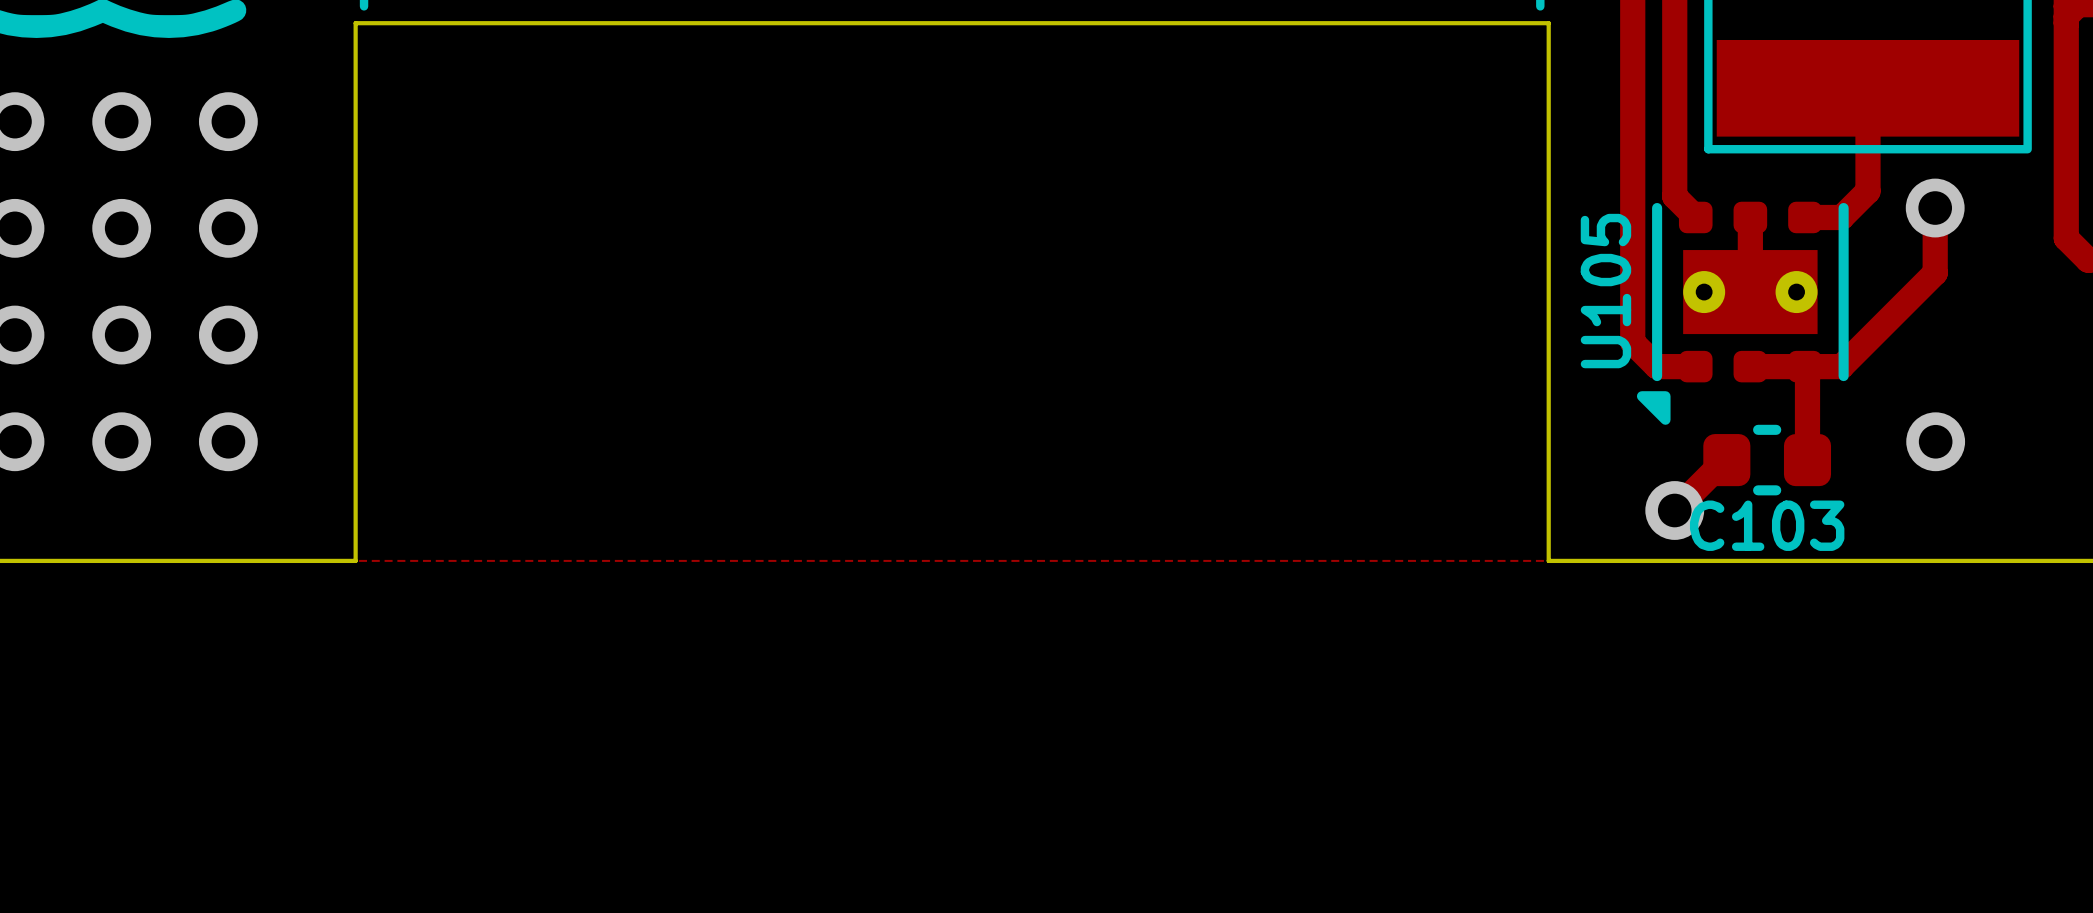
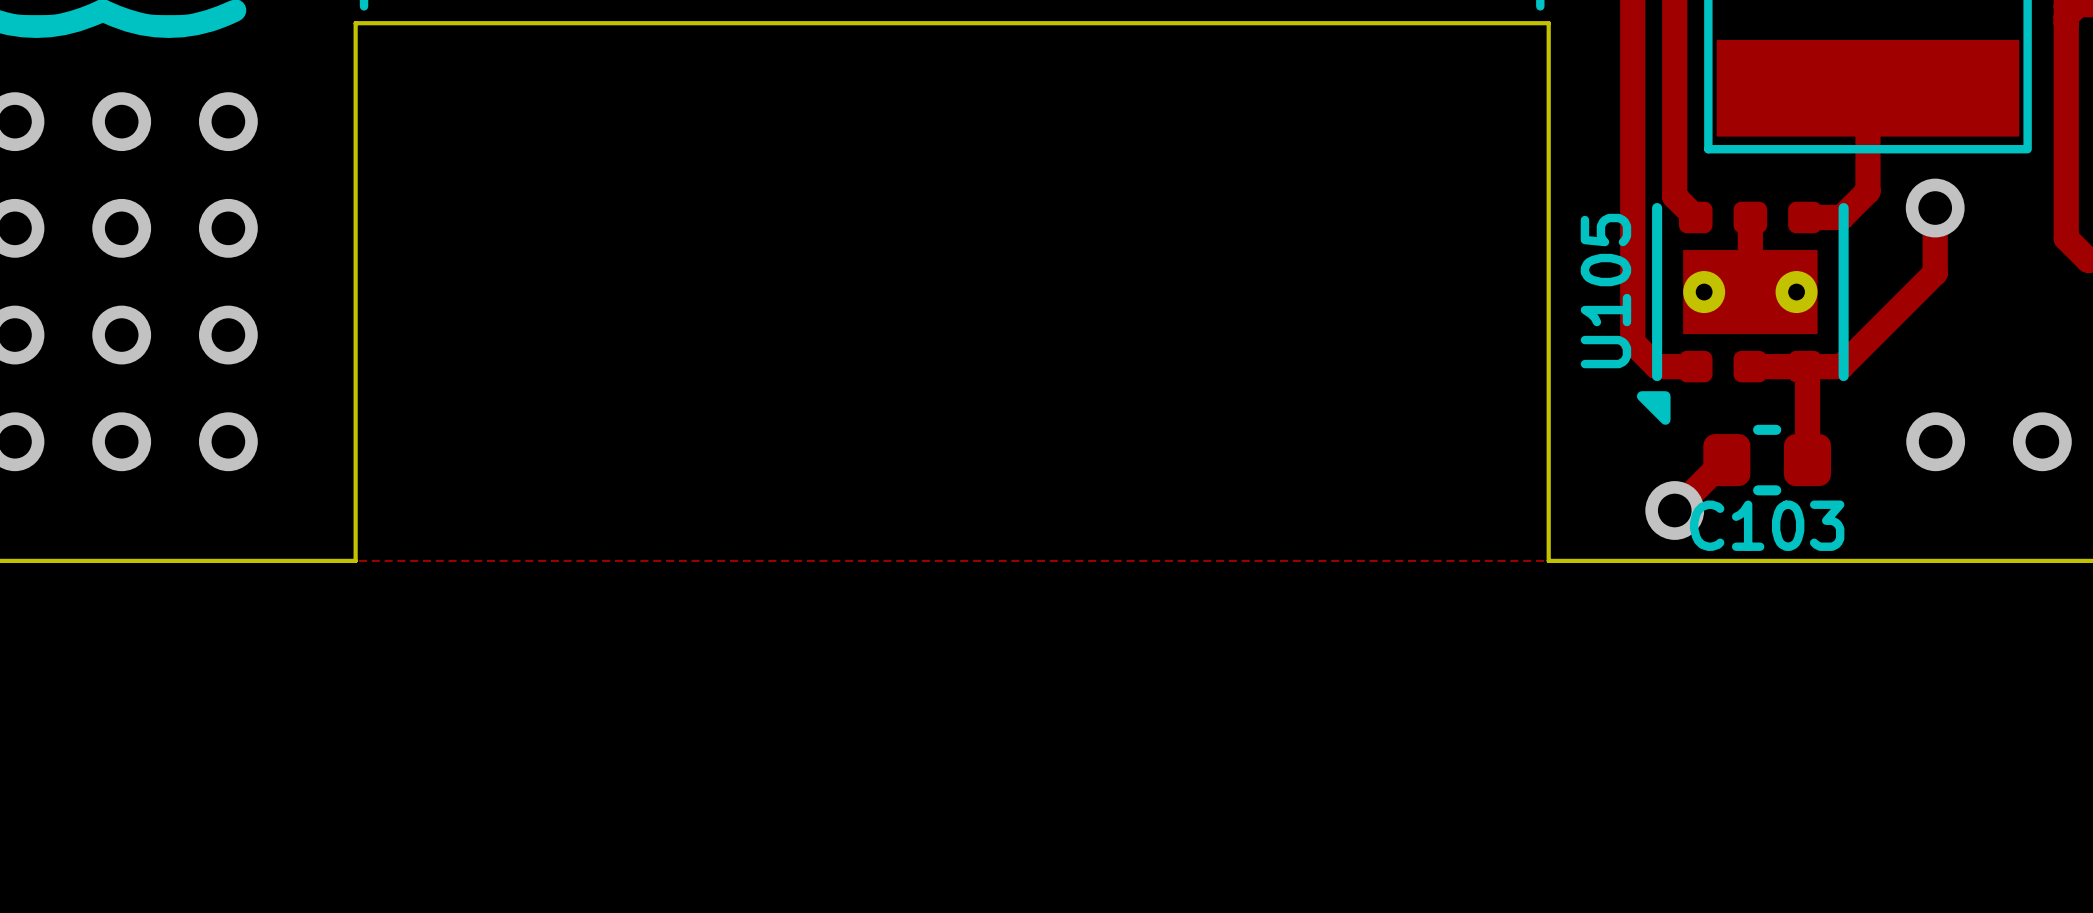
via: none -> (2042, 441)

